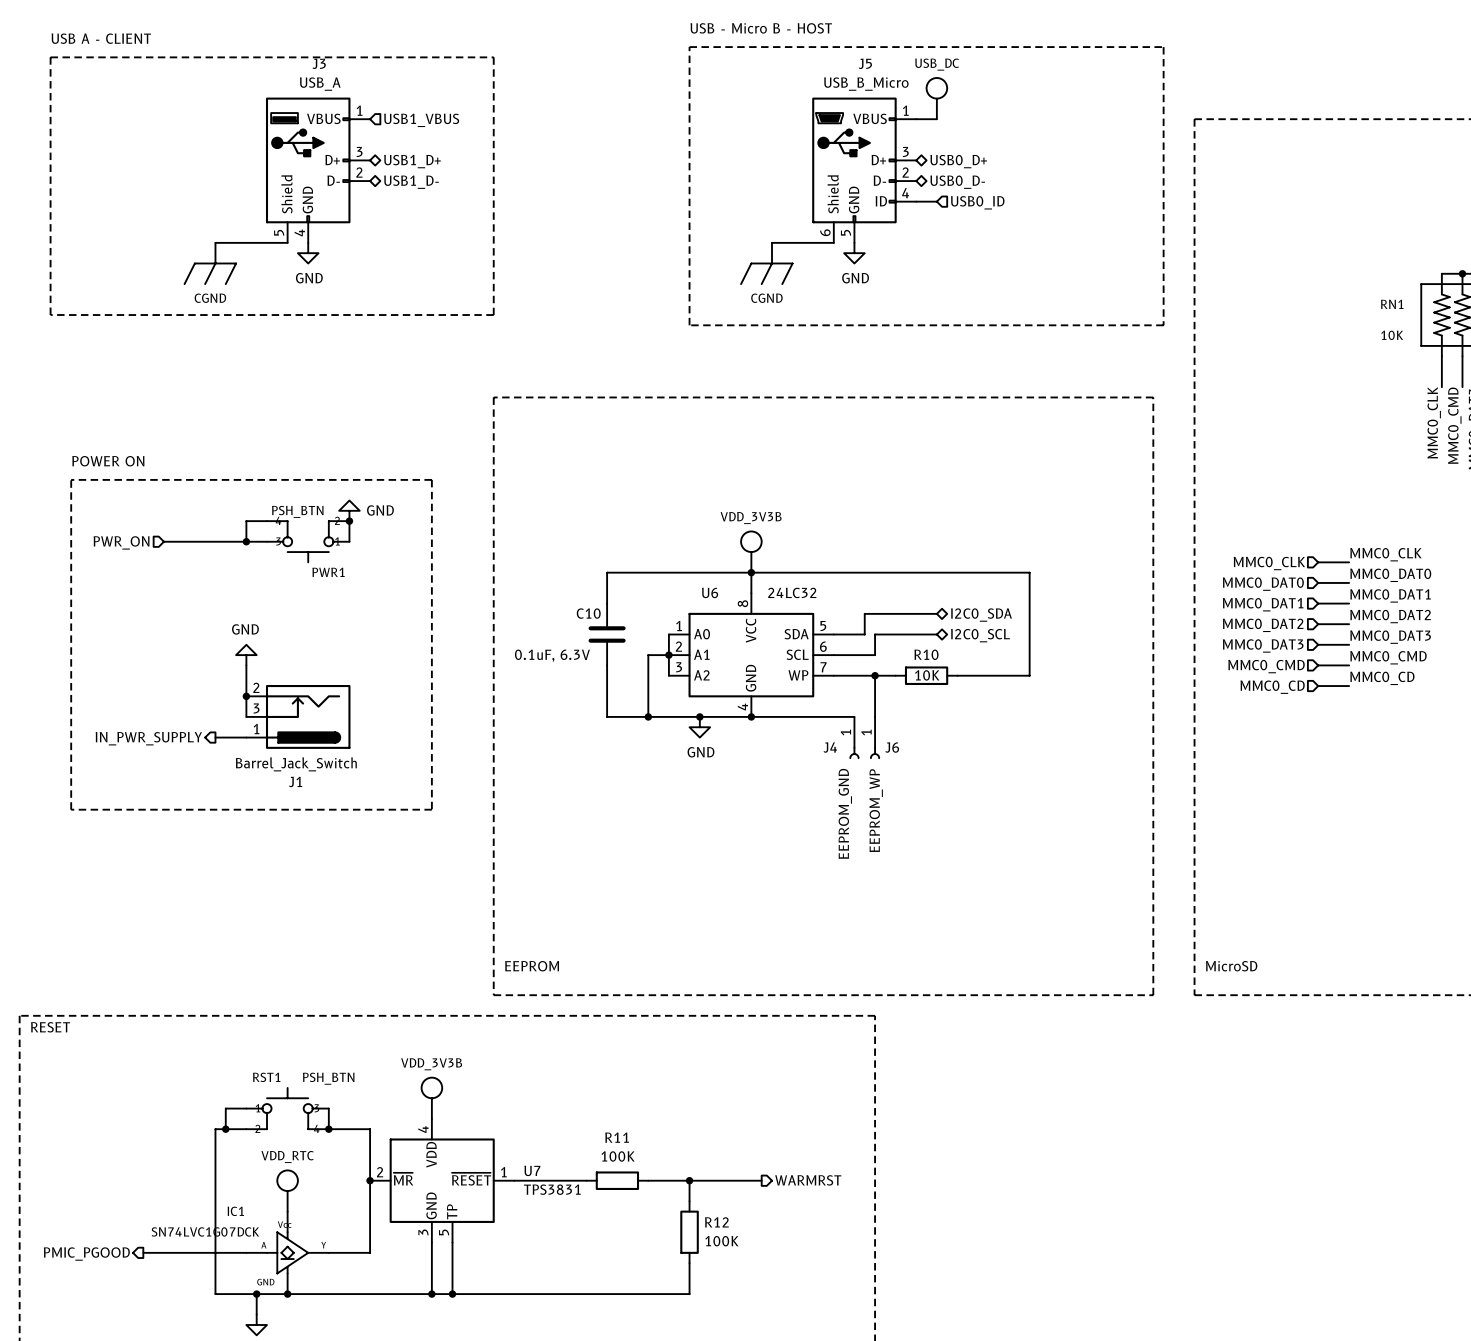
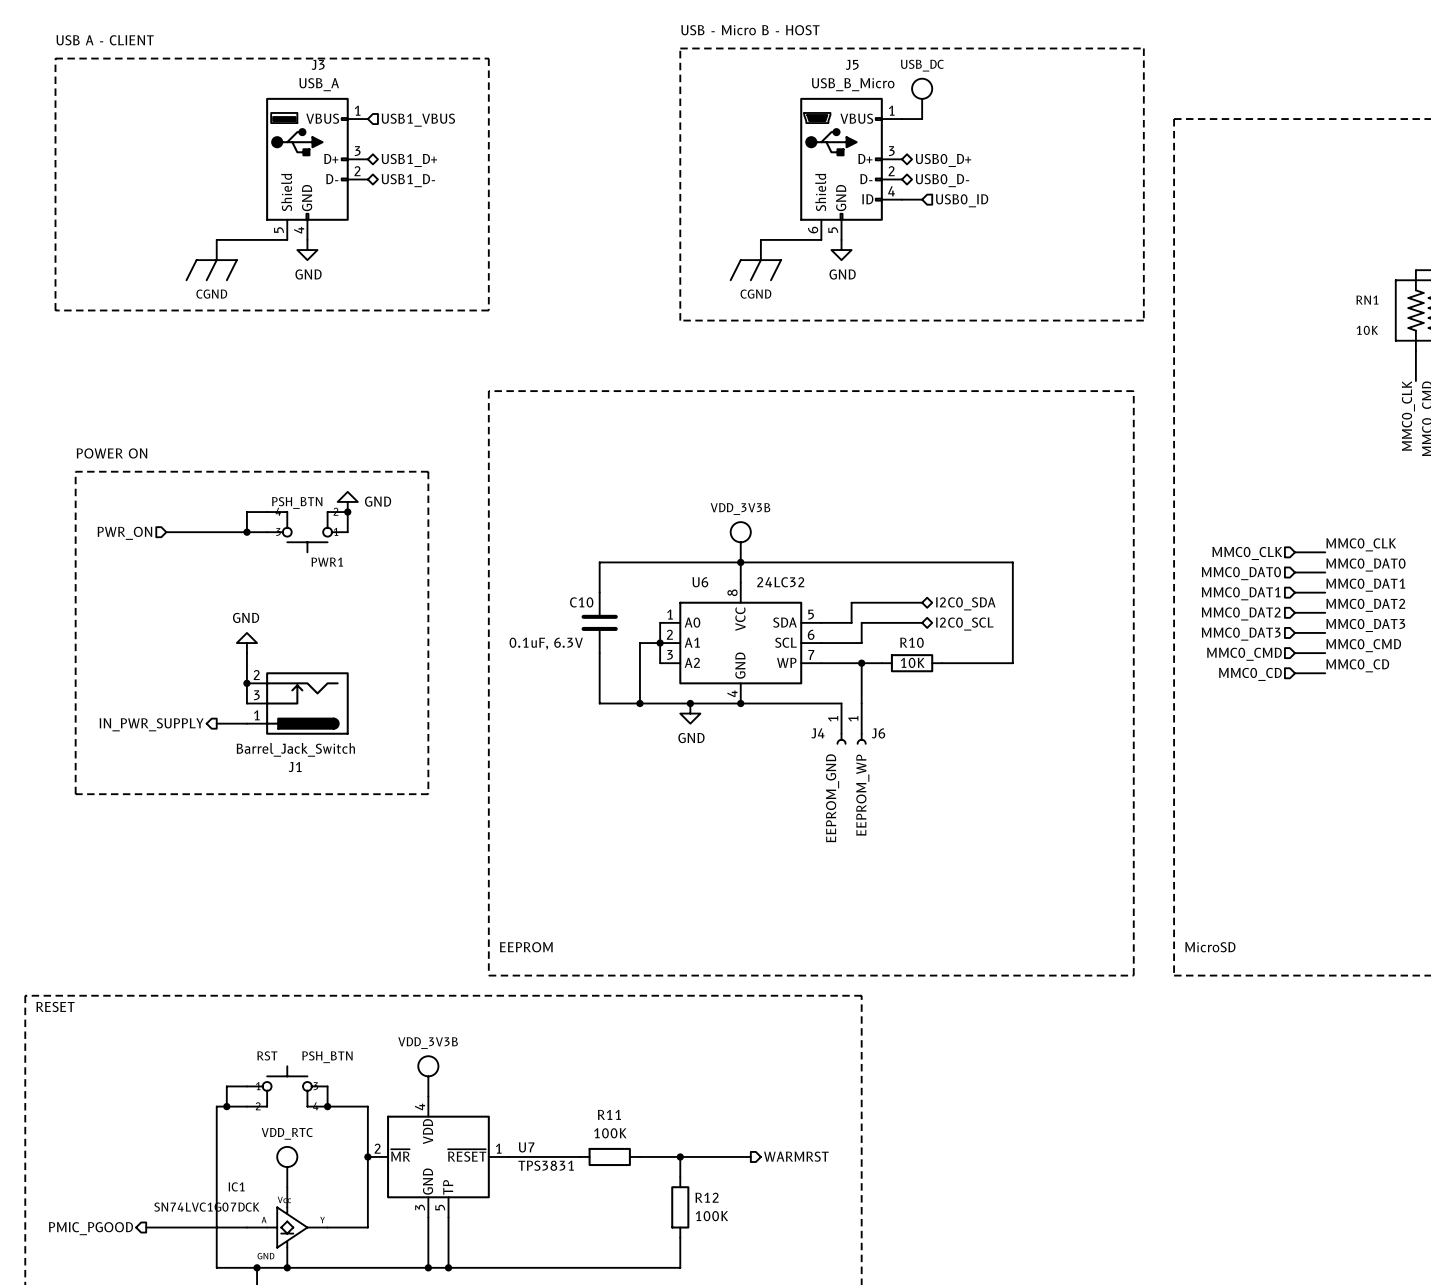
RST1 name: RST1 (266, 1077) -> RST (267, 1055)

